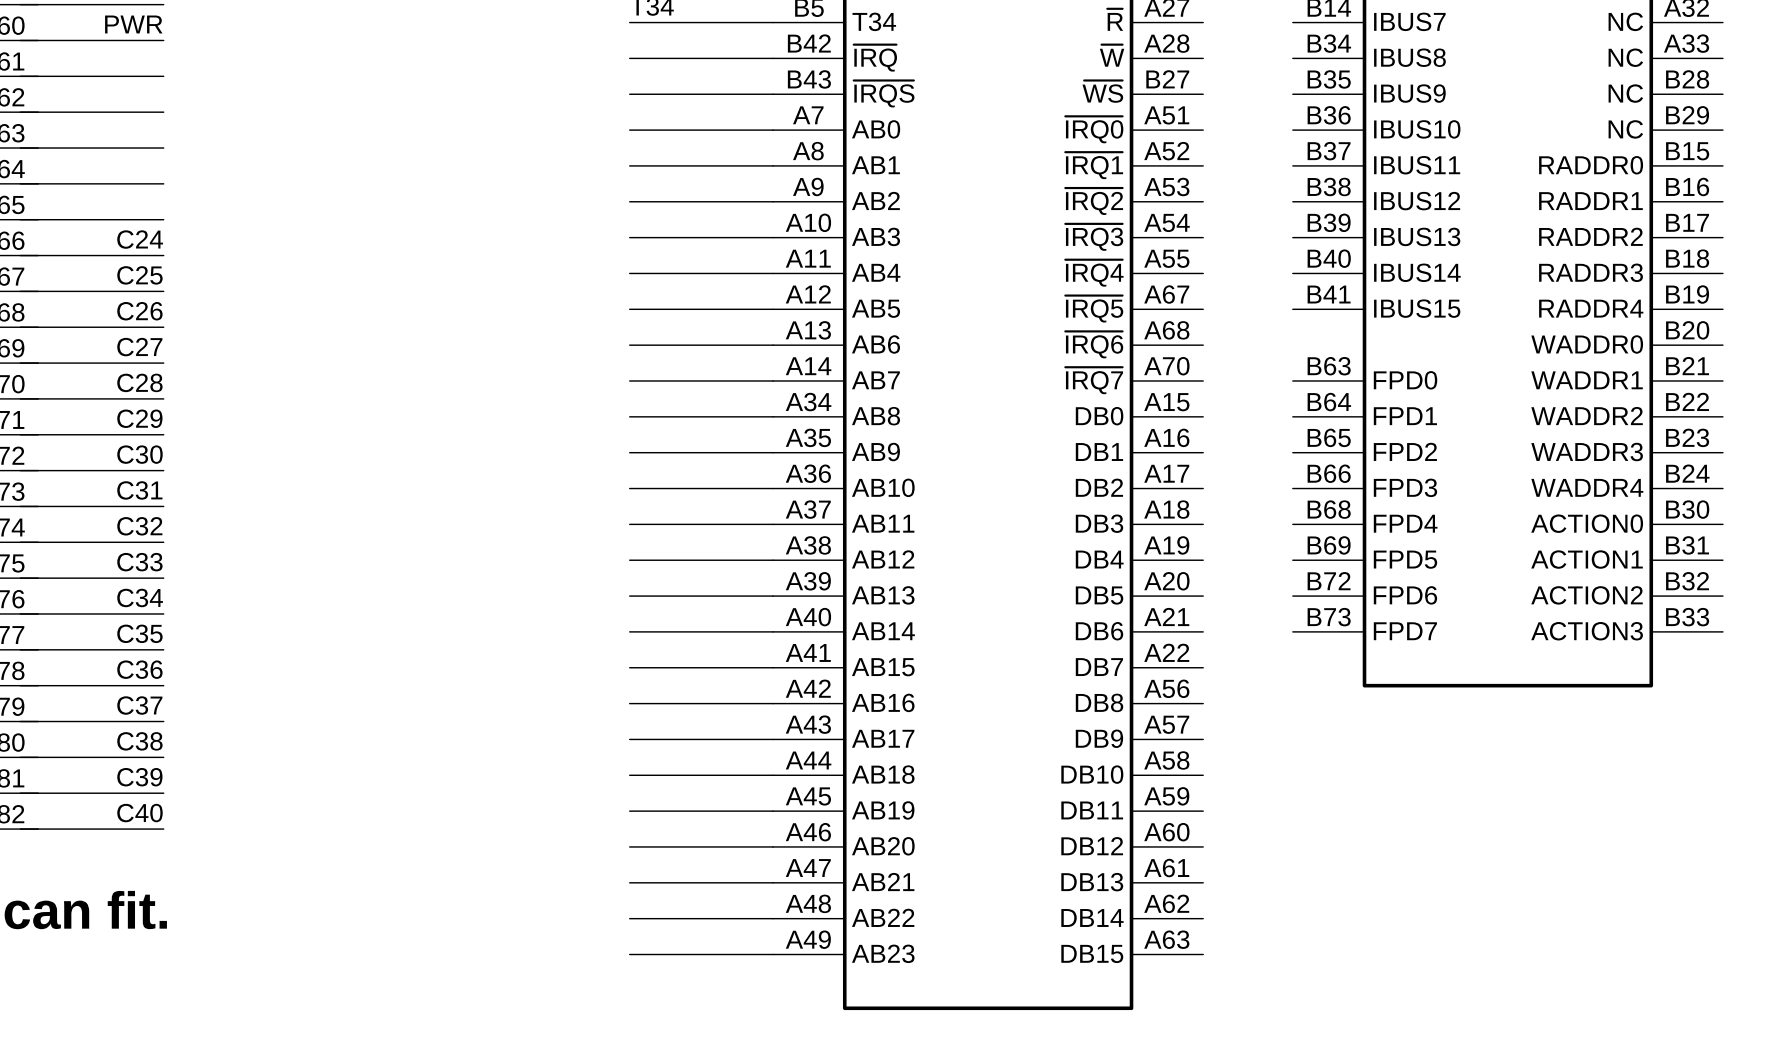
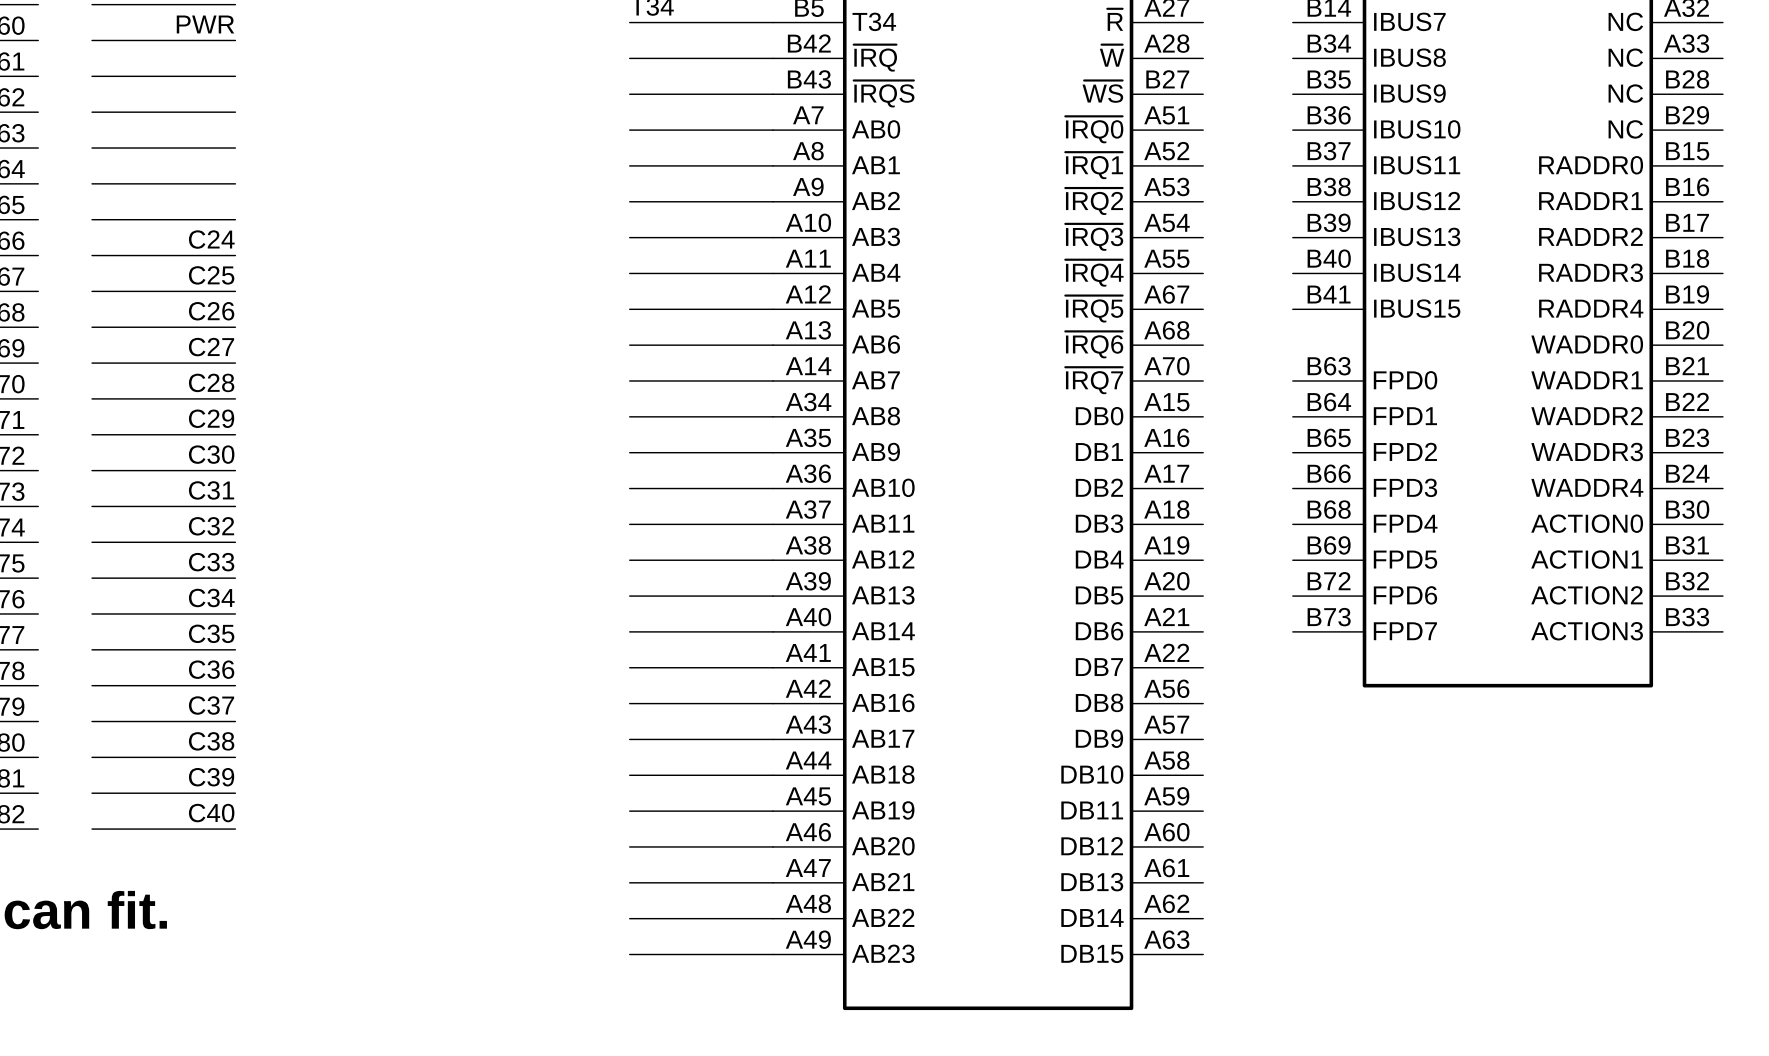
wire: (20, 4) (92, 4) -> (163, 4) (235, 4)
label: PWR (133, 24) -> none
label: none -> PWR (205, 24)
wire: (20, 40) (92, 40) -> (163, 40) (235, 40)
wire: (20, 76) (92, 76) -> (163, 76) (235, 76)
wire: (20, 112) (92, 112) -> (163, 112) (235, 112)
wire: (20, 148) (92, 148) -> (163, 148) (235, 148)
wire: (20, 183) (92, 183) -> (163, 183) (235, 183)
wire: (20, 219) (92, 219) -> (163, 219) (235, 219)
label position: C24 (140, 239) -> C24 (211, 239)
wire: (20, 255) (92, 255) -> (163, 255) (235, 255)
label position: C25 (139, 275) -> C25 (211, 275)
wire: (20, 291) (92, 291) -> (163, 291) (235, 291)
label position: C26 (139, 311) -> C26 (211, 311)
wire: (20, 327) (92, 327) -> (163, 327) (235, 327)
label position: C27 (139, 347) -> C27 (211, 347)
wire: (20, 363) (92, 363) -> (163, 363) (235, 363)
label position: C28 (139, 382) -> C28 (211, 382)
wire: (20, 398) (92, 398) -> (163, 398) (235, 398)
label position: C29 (139, 418) -> C29 (211, 418)
wire: (20, 434) (92, 434) -> (163, 434) (235, 434)
label position: C30 (139, 454) -> C30 (211, 454)
wire: (20, 470) (92, 470) -> (163, 470) (235, 470)
label position: C31 (139, 490) -> C31 (211, 490)
wire: (20, 506) (92, 506) -> (163, 506) (235, 506)
label position: C32 (139, 526) -> C32 (211, 526)
wire: (20, 542) (92, 542) -> (163, 542) (235, 542)
label position: C33 (139, 562) -> C33 (211, 562)
wire: (20, 578) (92, 578) -> (163, 578) (235, 578)
label position: C34 (140, 597) -> C34 (211, 597)
wire: (20, 613) (92, 613) -> (163, 613) (235, 613)
label position: C35 (139, 633) -> C35 (211, 633)
wire: (20, 649) (92, 649) -> (163, 649) (235, 649)
label position: C36 (139, 669) -> C36 (211, 669)
wire: (20, 685) (92, 685) -> (163, 685) (235, 685)
label position: C37 (139, 705) -> C37 (211, 705)
wire: (20, 721) (92, 721) -> (163, 721) (235, 721)
label position: C38 (139, 741) -> C38 (211, 741)
wire: (20, 757) (92, 757) -> (163, 757) (235, 757)
label position: C39 (139, 777) -> C39 (211, 777)
wire: (20, 793) (92, 793) -> (163, 793) (235, 793)
label position: C40 (139, 813) -> C40 (211, 813)
wire: (20, 829) (92, 829) -> (163, 829) (235, 829)

